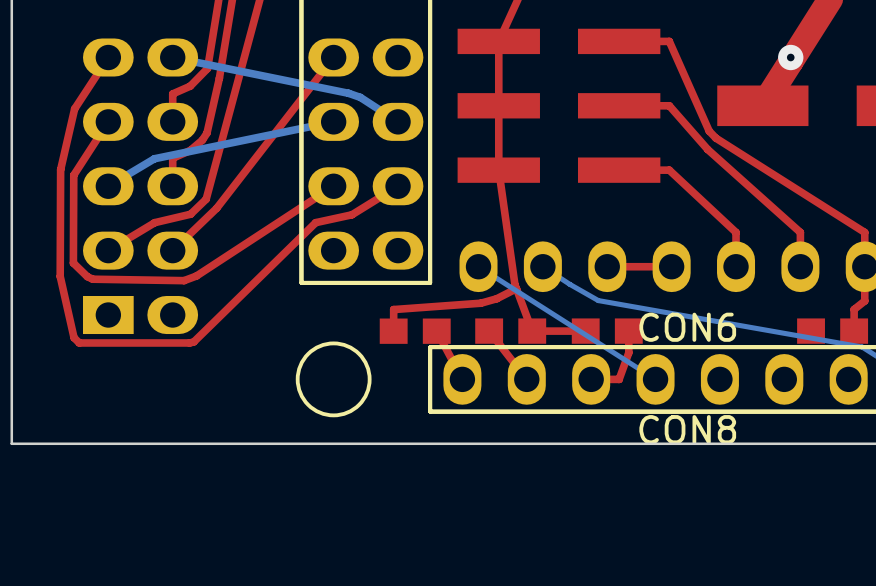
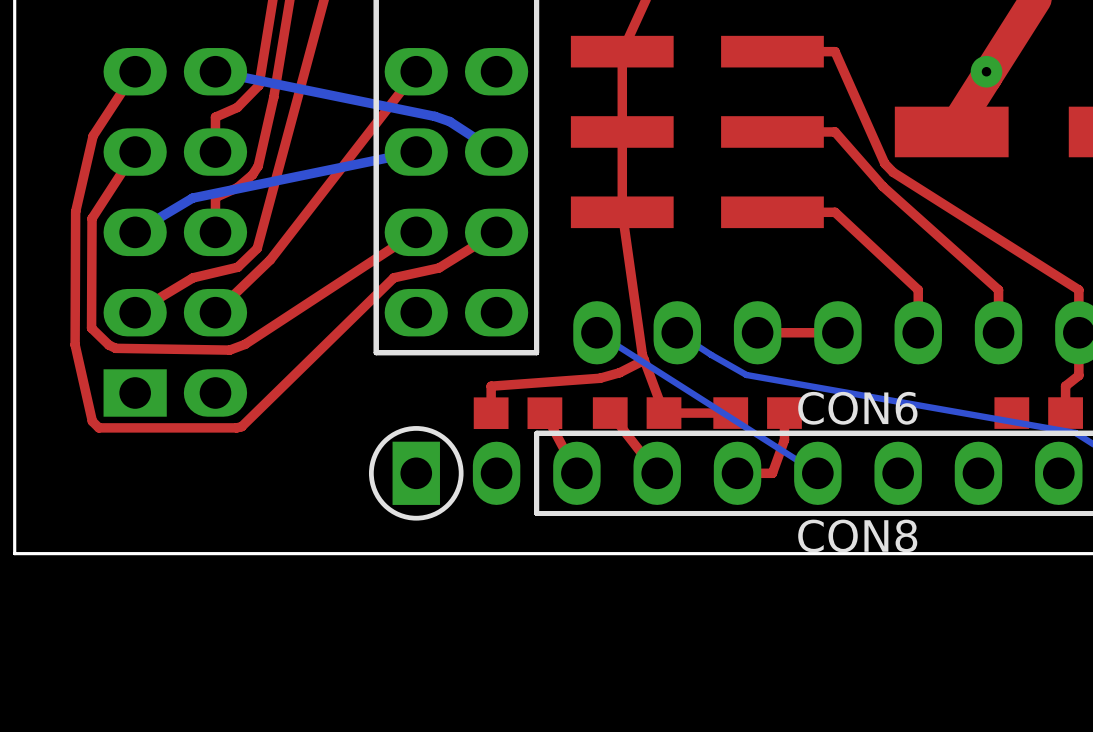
part: none -> (456, 473)

